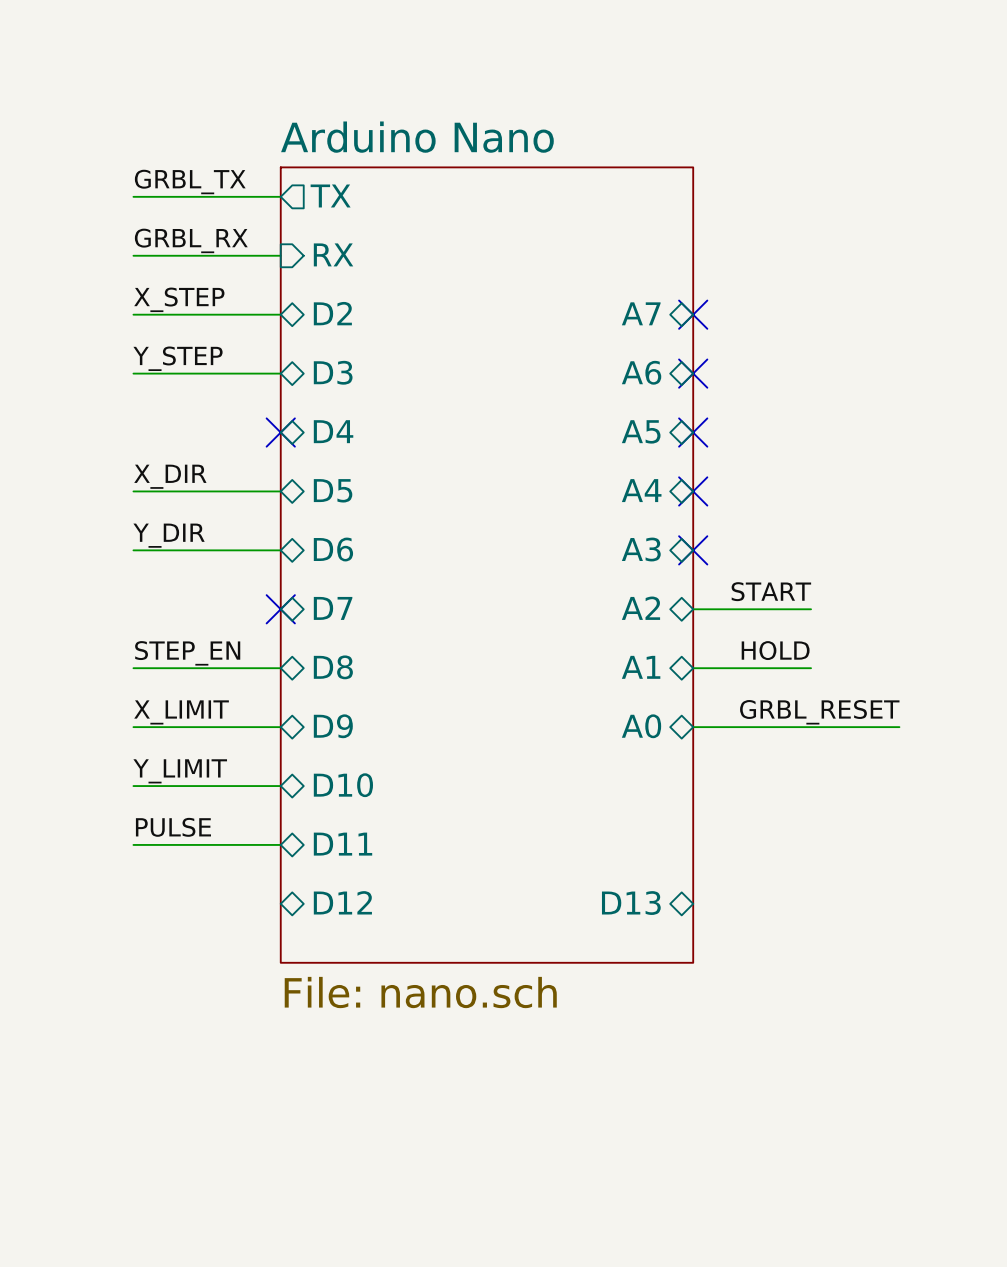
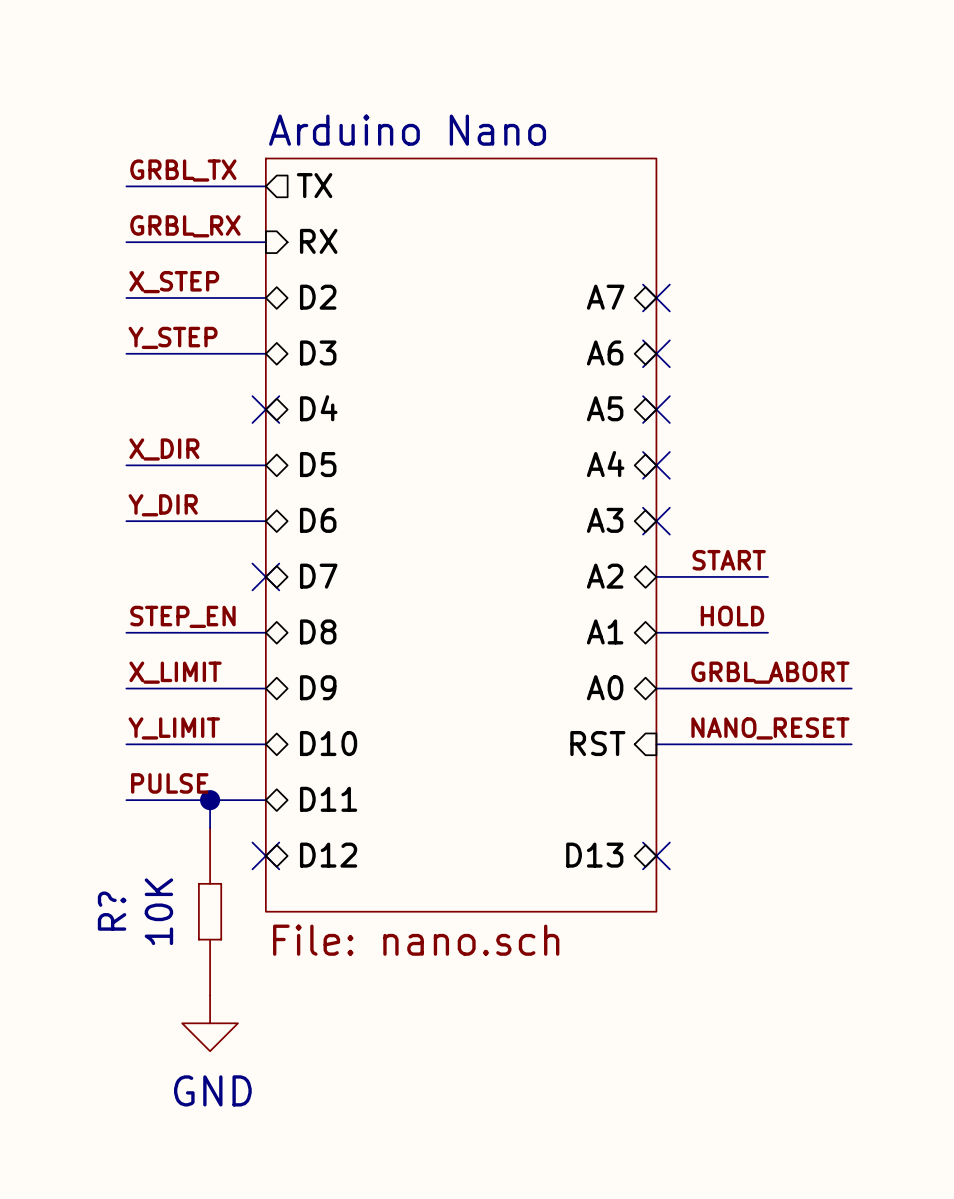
label: GRBL_RESET (819, 712) -> GRBL_ABORT (770, 672)
label: none -> NANO_RESET (770, 728)
sheet pin: none -> RST (597, 743)
wire: none -> (656, 744) (851, 744)
wire: none -> (210, 800) (210, 828)
junction: none -> (210, 800)
no-connect mark: none -> (265, 855)
no-connect mark: none -> (656, 855)
R?: none -> 10K (210, 911)
power symbol: none -> GND (210, 1023)

